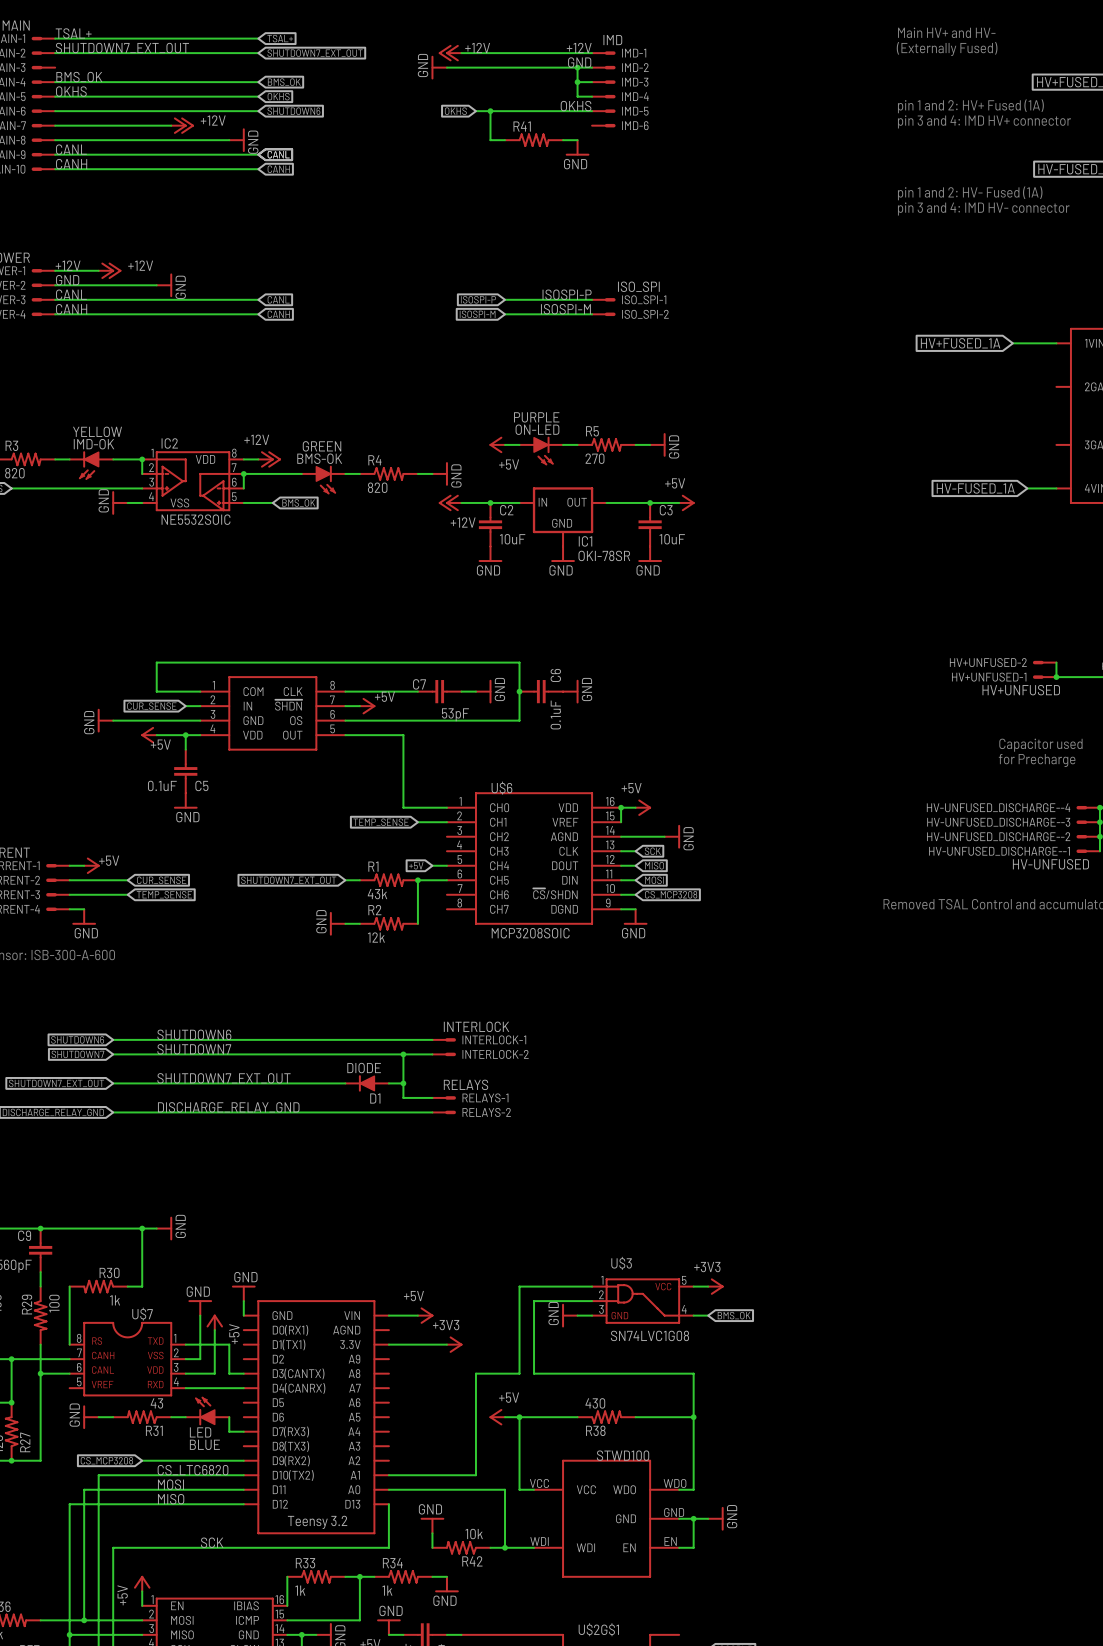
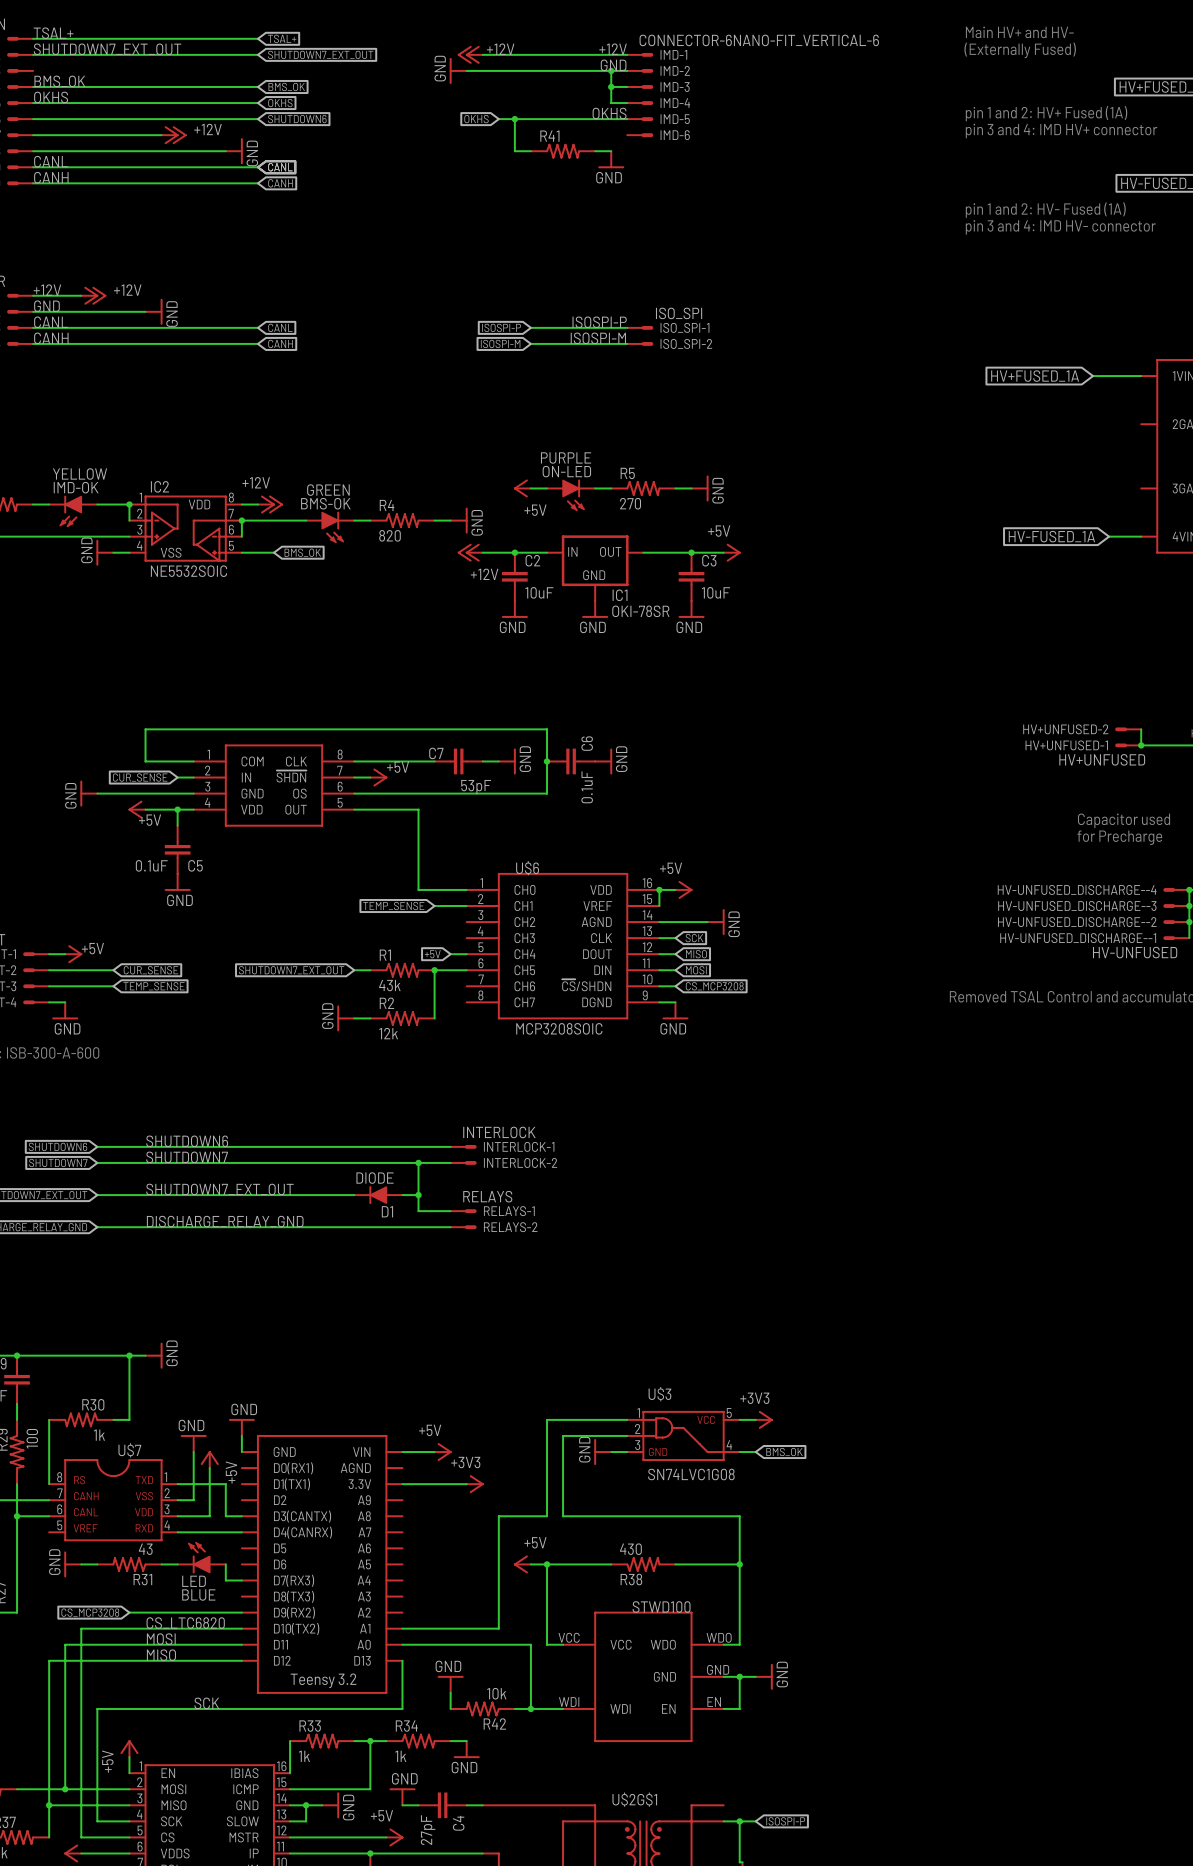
IMD-1 value: IMD (612, 40) -> CONNECTOR-6NANO-FIT_VERTICAL-6 (759, 40)

